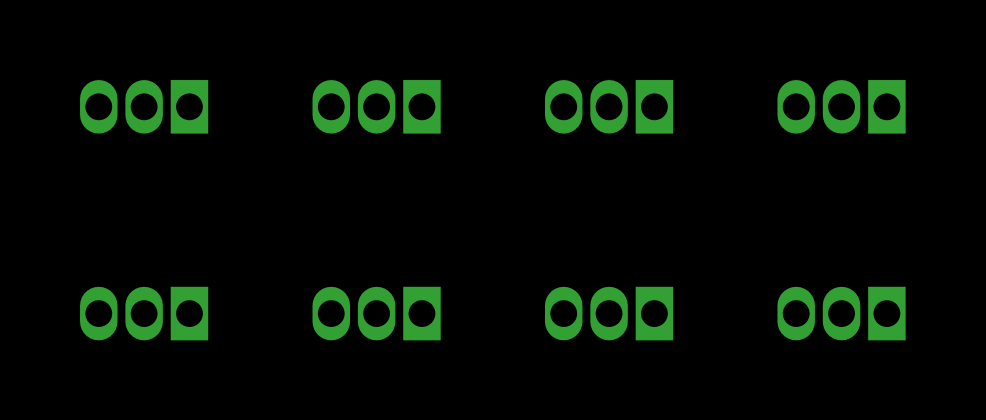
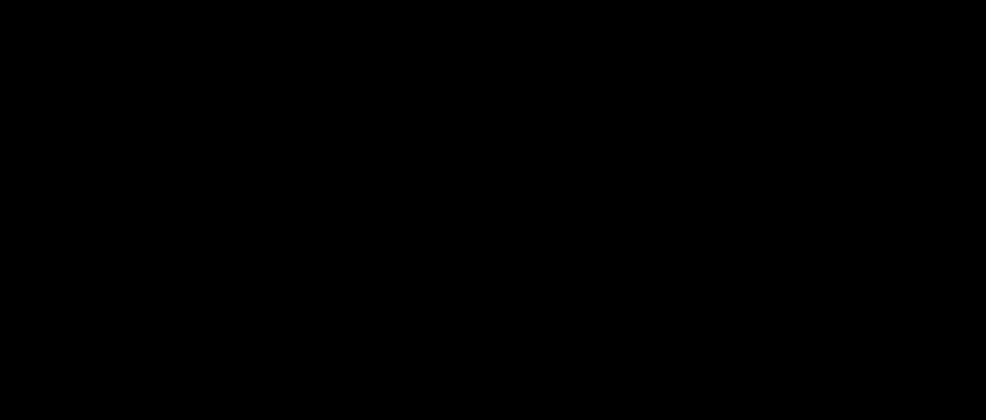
part: (144, 106) -> none
part: (376, 106) -> none
part: (609, 106) -> none
part: (841, 106) -> none
part: (144, 313) -> none
part: (376, 313) -> none
part: (609, 313) -> none
part: (841, 313) -> none

